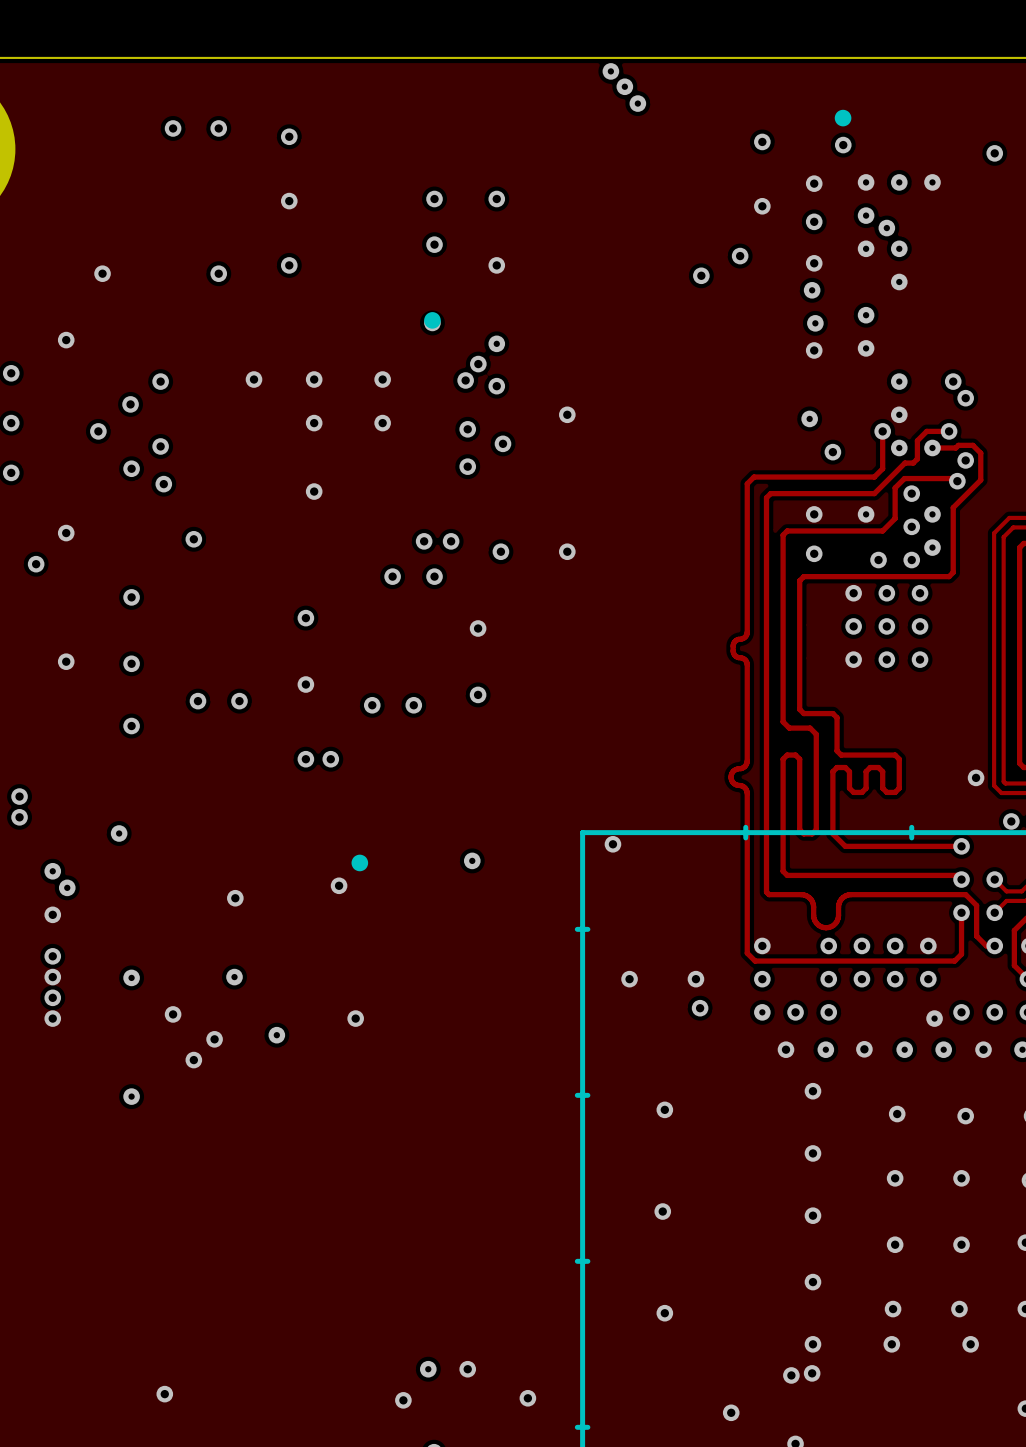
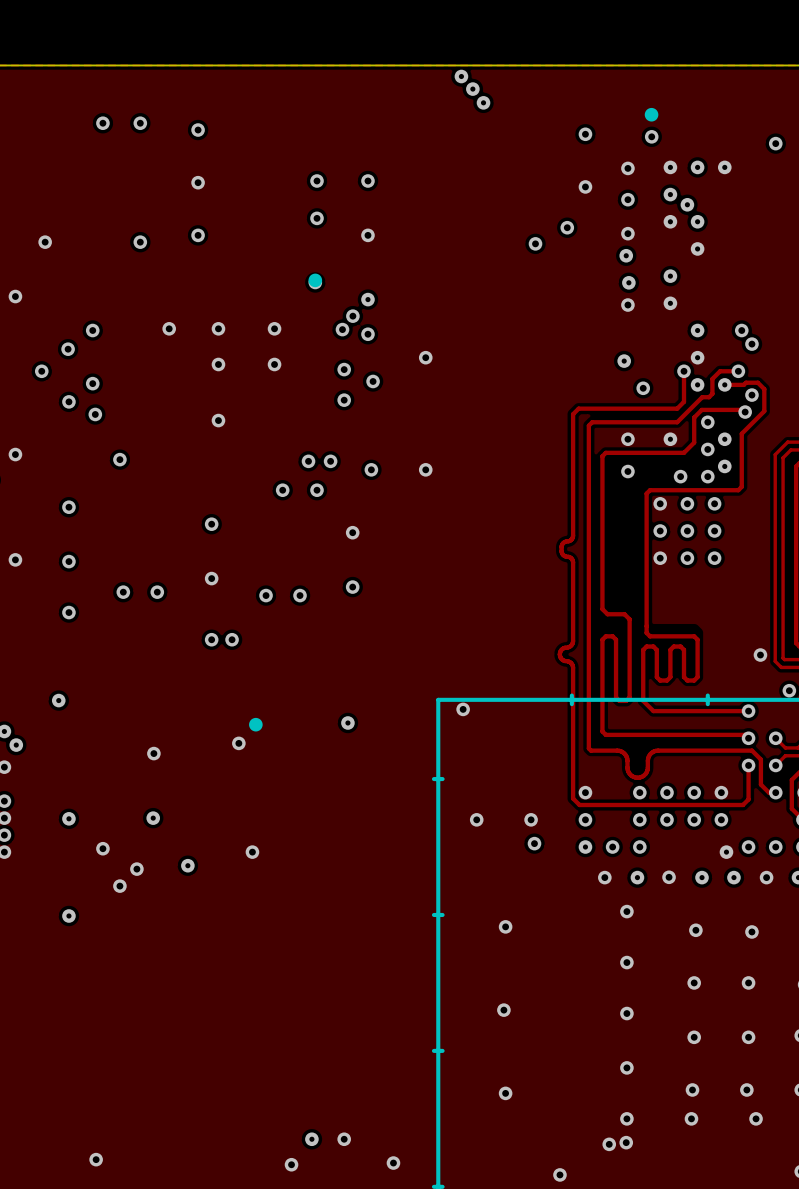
track: (841, 576) (803, 576) (799, 580) (799, 709) (803, 713) (832, 713) (837, 717) -> (650, 490) (646, 493) (646, 605)
track: (849, 788) (853, 792) (861, 792) (866, 788) -> (656, 663) (656, 677) (660, 680) (667, 680) (670, 677) (670, 663)
track: (882, 788) (886, 792) (895, 792) (899, 788) -> (684, 663) (684, 677) (687, 680) (694, 680) (697, 677) (697, 663)

